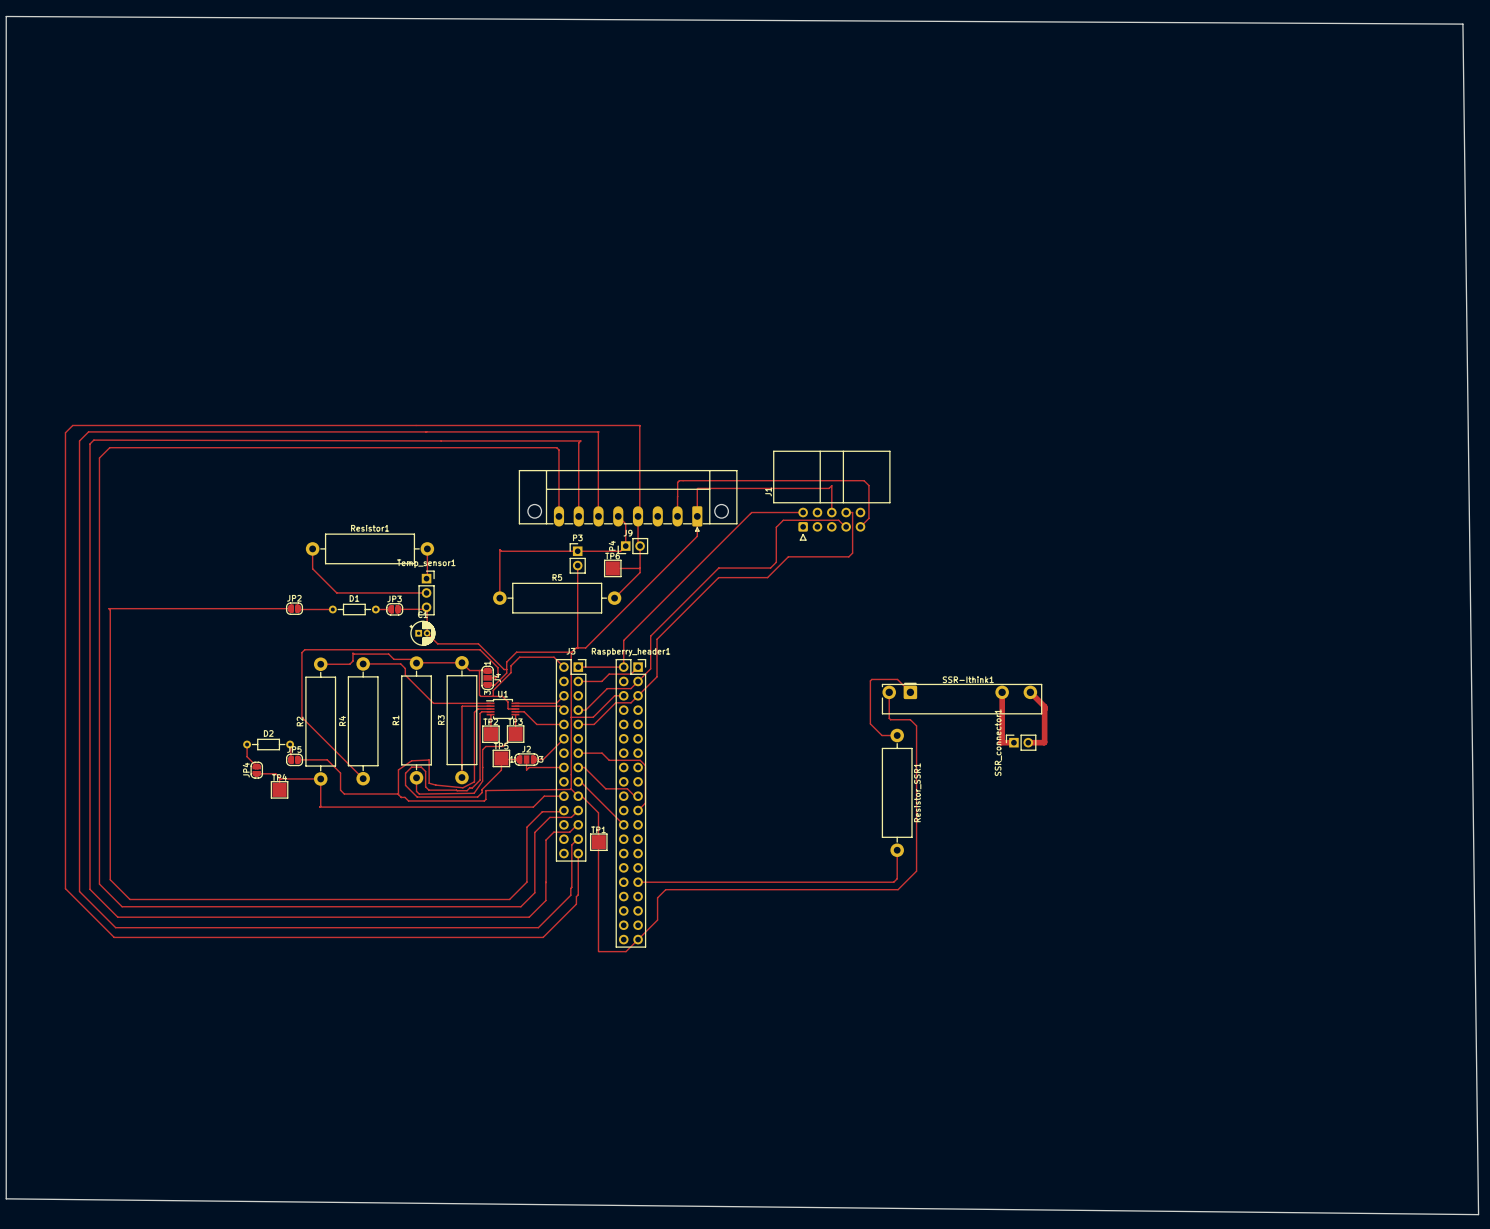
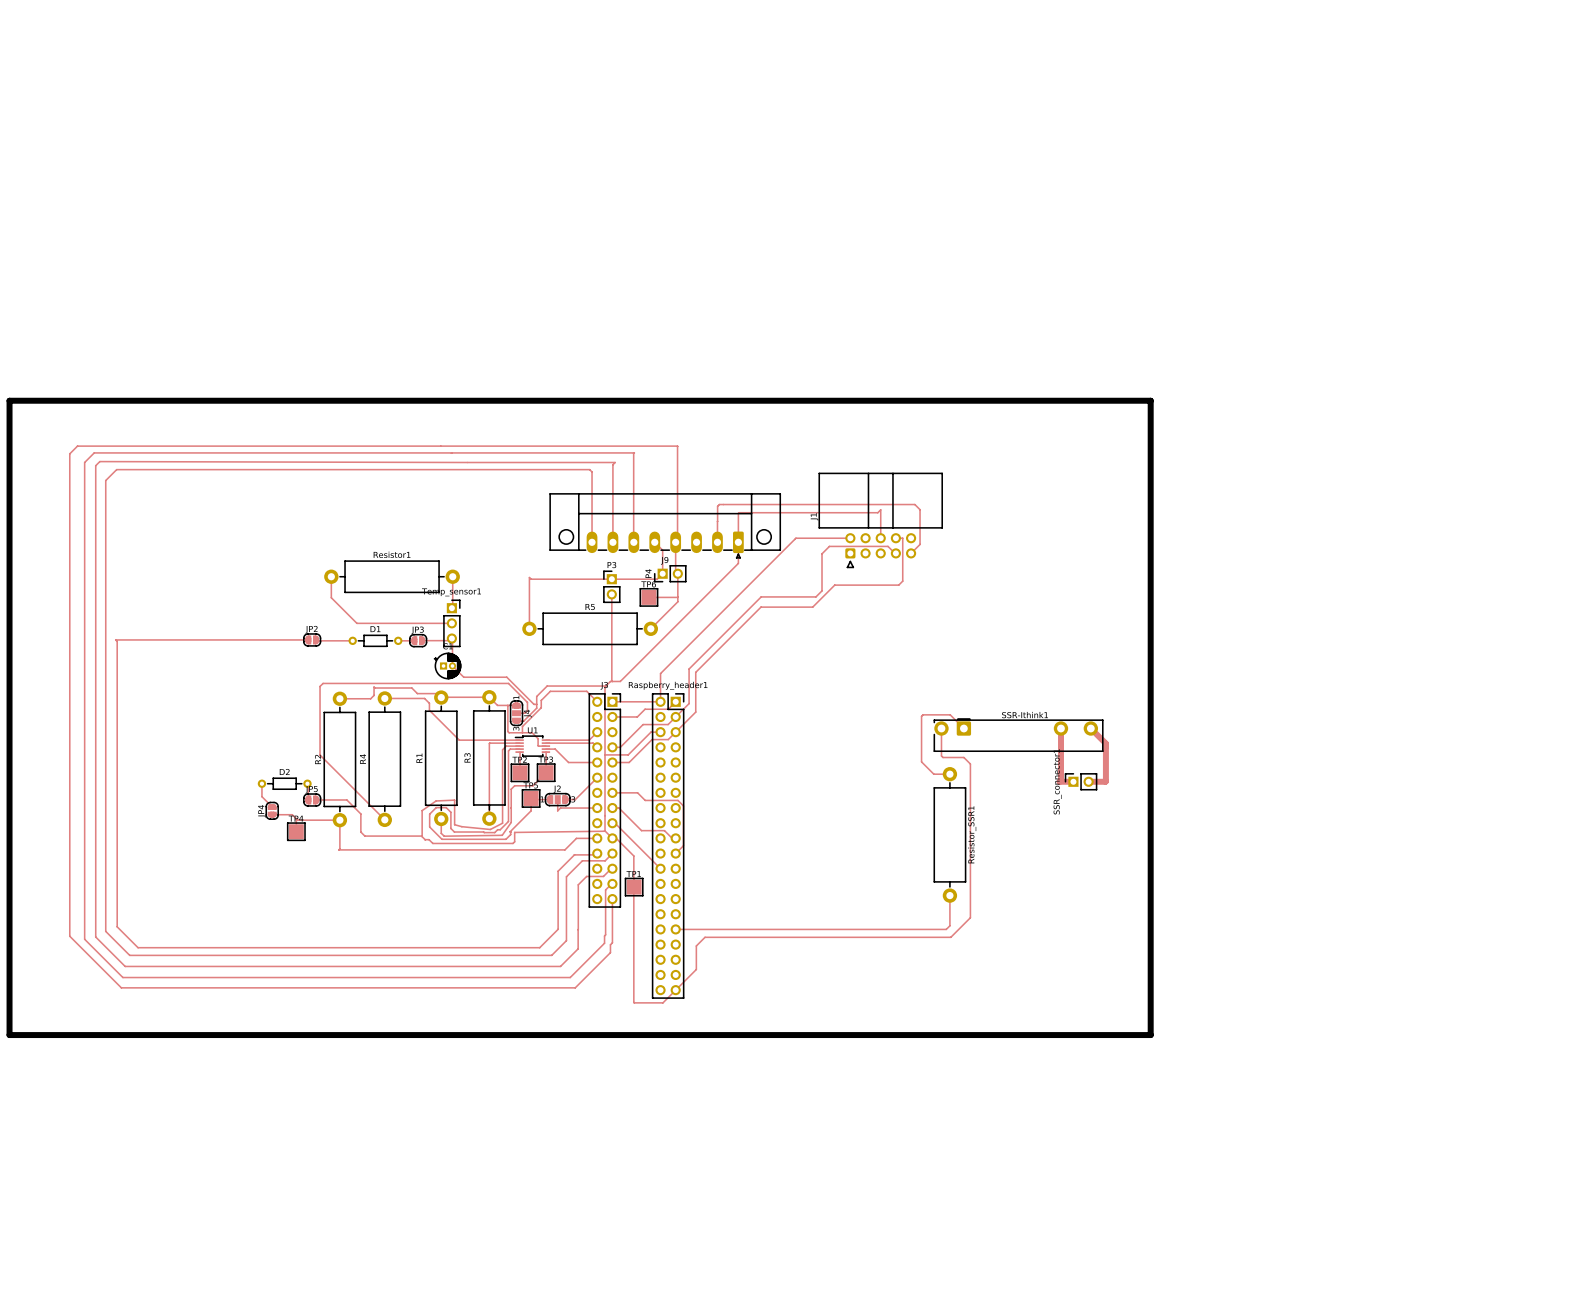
board edge: (6, 16) (6, 1198) (1478, 1214) (1462, 24) (6, 16) -> none
board edge: none -> (9, 400) (9, 1035) (1150, 1035) (1150, 400) (9, 400)

